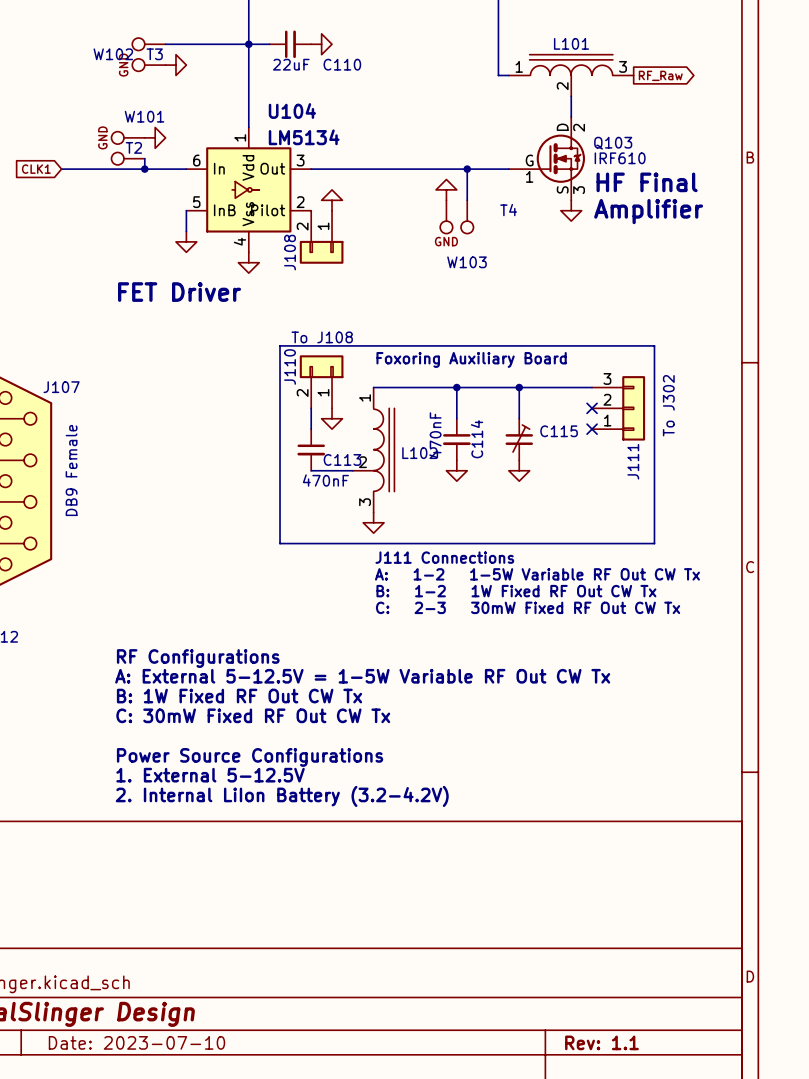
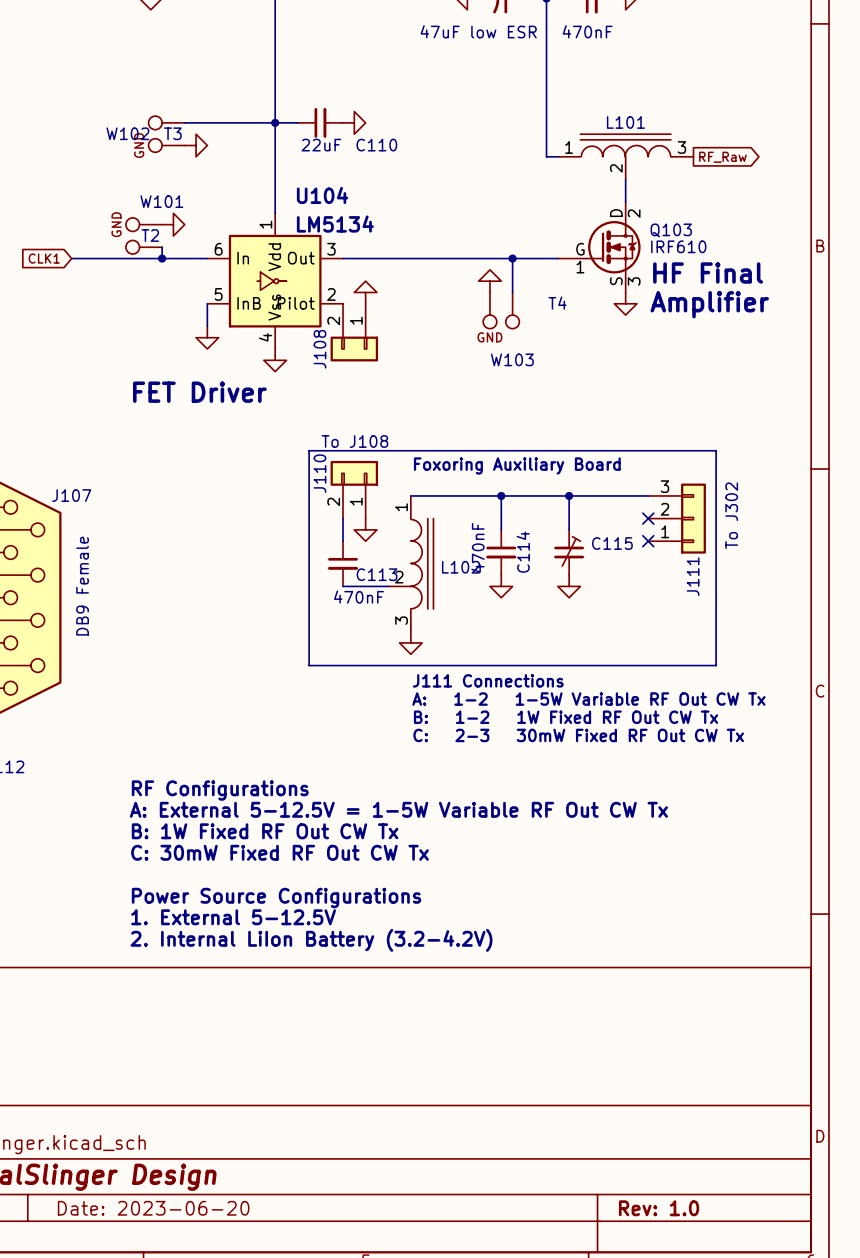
title block: Date: 2023-07-10 (136, 1042) -> Date: 2023-06-20 (153, 1208)
title block: Rev: 1.1 (601, 1042) -> Rev: 1.0 (659, 1208)

